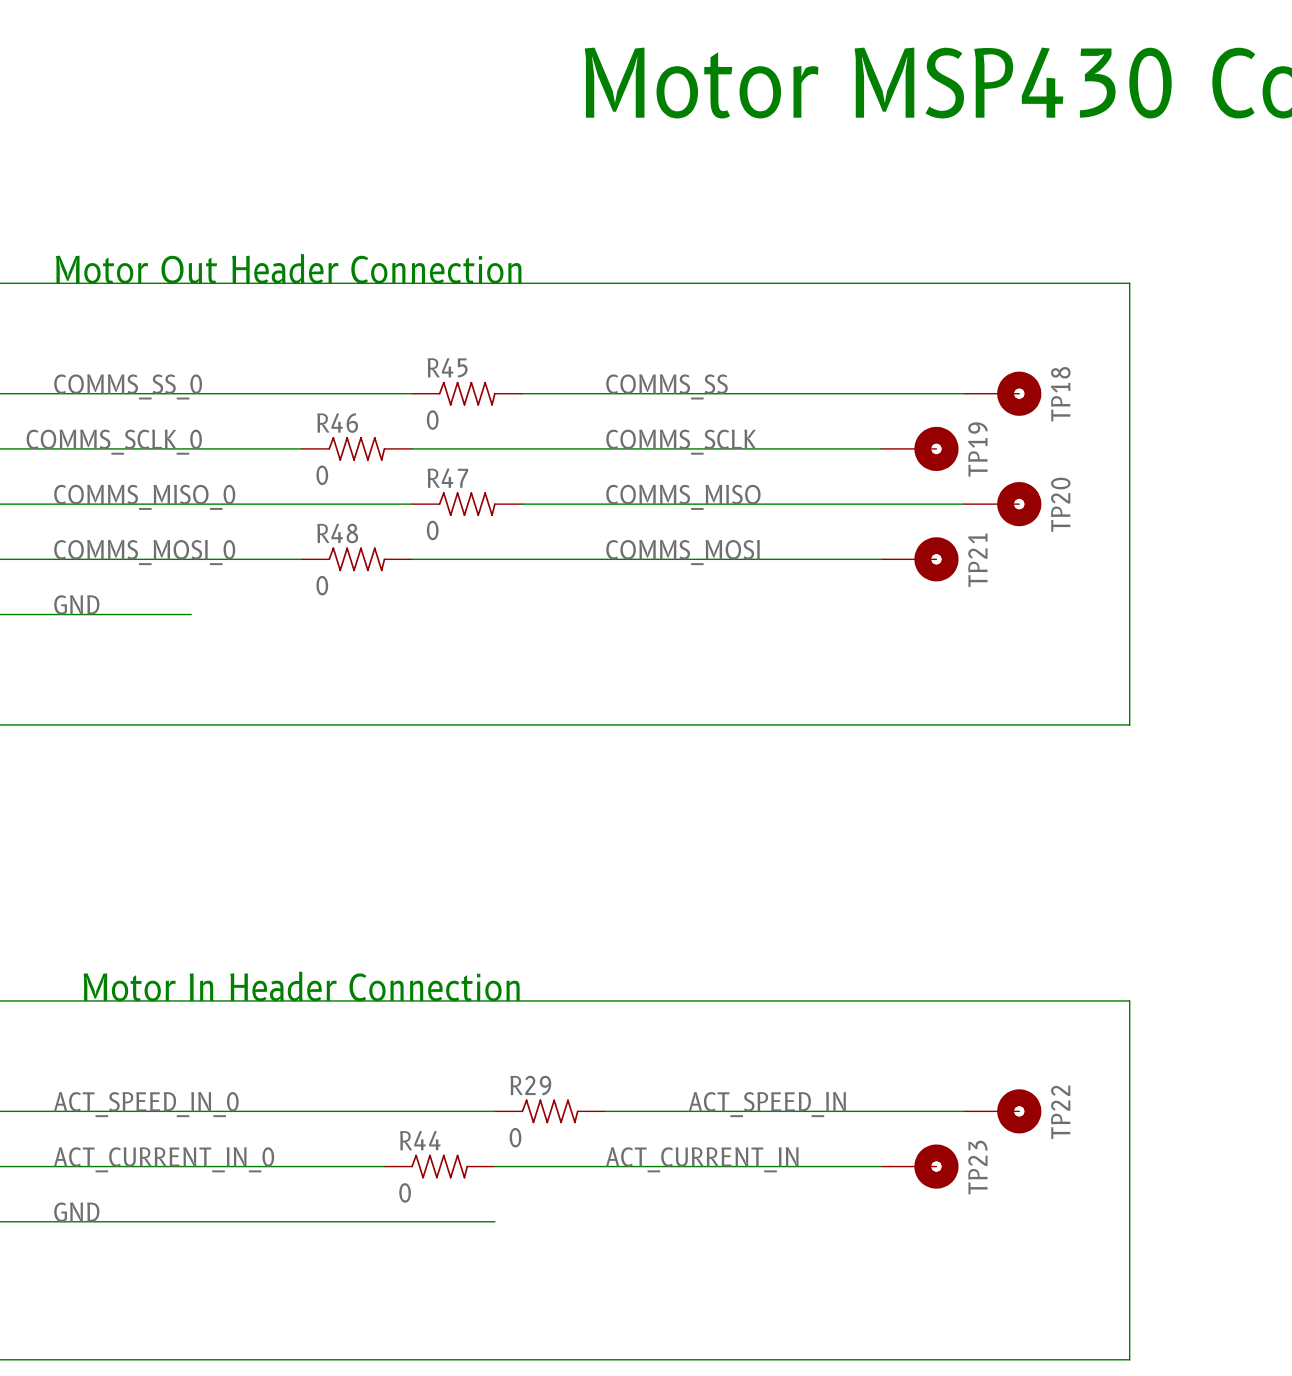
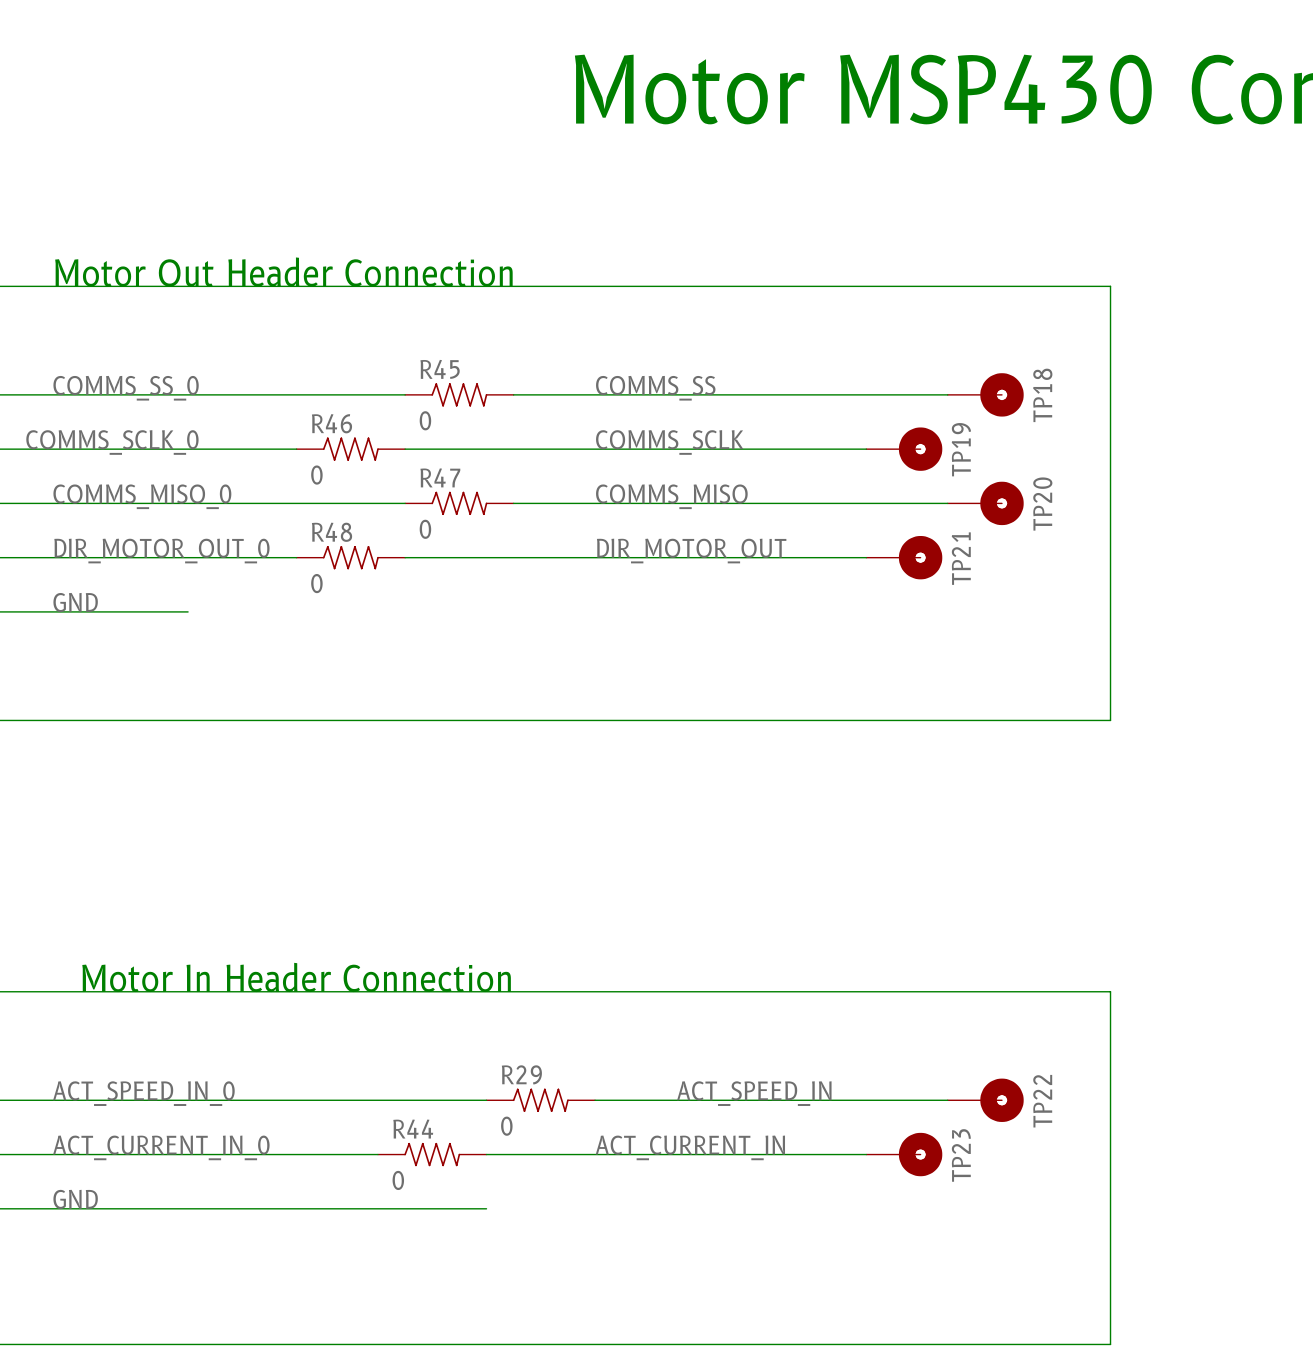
label: COMMS_MOSI_0 (144, 552) -> DIR_MOTOR_OUT_0 (161, 551)
label: COMMS_MOSI (682, 552) -> DIR_MOTOR_OUT (691, 551)

